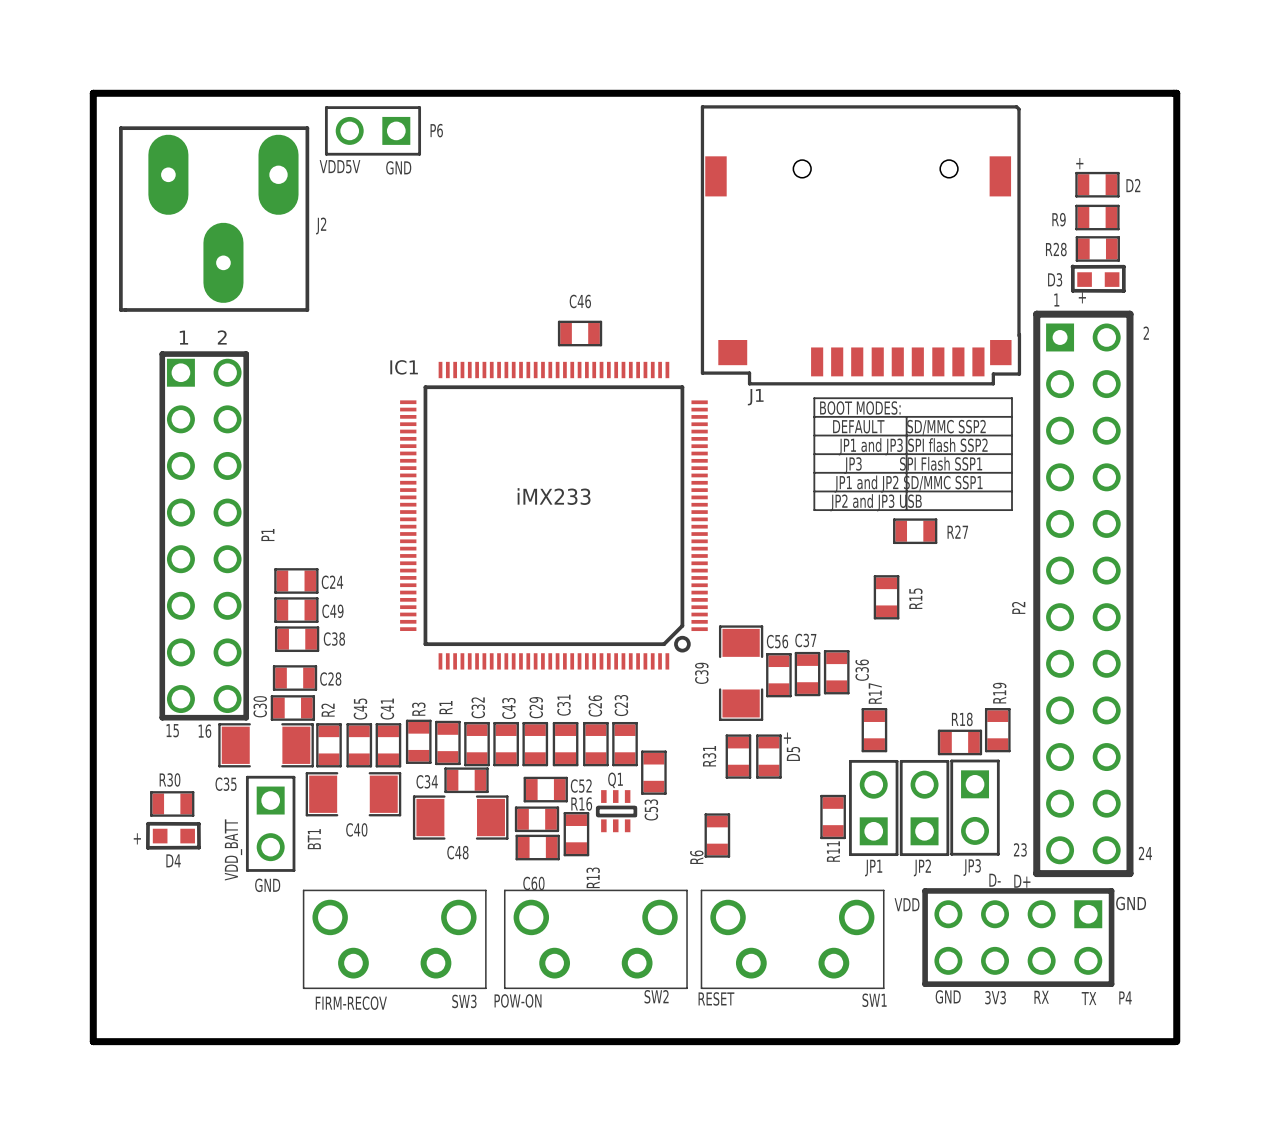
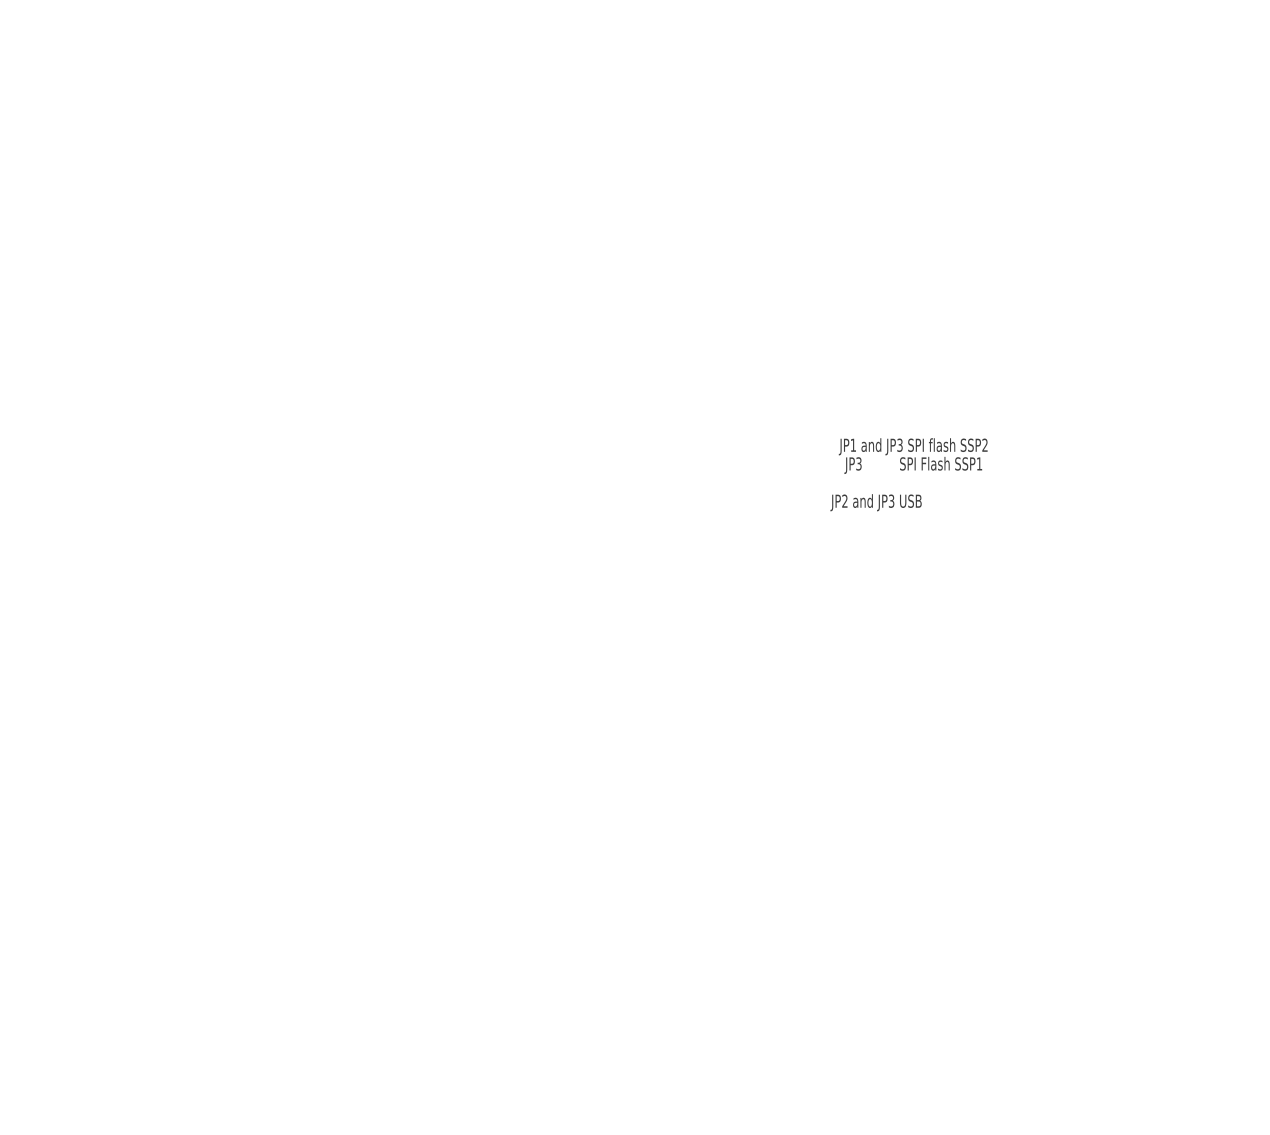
P6: (373, 130) -> none
text: + (1079, 163) -> none
text: VDD5V (339, 166) -> none
text: GND (398, 167) -> none
D2: (1097, 184) -> none
R9: (1097, 217) -> none
J2: (214, 219) -> none
J1: (860, 245) -> none
R28: (1097, 248) -> none
D3: (1098, 278) -> none
text: + (1082, 297) -> none
text: 1 (1056, 300) -> none
C46: (580, 333) -> none
text: 2 (1146, 333) -> none
text: 1 (183, 337) -> none
text: 2 (222, 337) -> none
line: (814, 398) (814, 510) (1012, 510) (1012, 398) (814, 398) -> none
text: BOOT MODES: (860, 408) -> none
line: (814, 416) (1012, 416) -> none
line: (906, 417) (906, 510) -> none
text: DEFAULT SD/MMC SSP2 (909, 427) -> none
line: (814, 435) (1012, 435) -> none
line: (814, 454) (1012, 454) -> none
line: (814, 472) (1012, 472) -> none
text: JP1 and JP2 SD/MMC SSP1 (908, 484) -> none
line: (814, 491) (1012, 491) -> none
IC1: iMX233 (553, 515) -> none
R27: (915, 531) -> none
P1: (204, 535) -> none
C24: (296, 580) -> none
P2: (1083, 593) -> none
R15: (886, 597) -> none
C49: (296, 610) -> none
C38: (297, 639) -> none
C36: (836, 672) -> none
C39: (741, 673) -> none
C37: (807, 674) -> none
C56: (778, 675) -> none
C28: (295, 678) -> none
C30: (292, 708) -> none
text: 15 (172, 730) -> none
R17: (874, 730) -> none
R19: (997, 730) -> none
text: 16 (204, 731) -> none
text: + (787, 738) -> none
R3: (418, 741) -> none
R1: (447, 742) -> none
R18: (959, 742) -> none
C32: (477, 744) -> none
C43: (506, 744) -> none
C29: (535, 744) -> none
C31: (565, 744) -> none
C26: (595, 744) -> none
C23: (625, 744) -> none
C35: (266, 745) -> none
R2: (328, 745) -> none
C45: (359, 745) -> none
C41: (388, 745) -> none
R31: (738, 756) -> none
D5: (768, 756) -> none
C53: (653, 772) -> none
C34: (466, 780) -> none
C52: (545, 789) -> none
C40: (353, 794) -> none
R30: (172, 803) -> none
JP1: (873, 807) -> none
JP2: (924, 807) -> none
JP3: (975, 807) -> none
Q1: (616, 811) -> none
R11: (833, 816) -> none
C48: (460, 817) -> none
R16: (537, 819) -> none
BT1: (270, 823) -> none
R13: (576, 834) -> none
D4: (173, 835) -> none
R6: (717, 835) -> none
text: + (137, 838) -> none
C60: (537, 847) -> none
text: VDD_BATT (233, 849) -> none
text: 23 (1020, 849) -> none
text: 24 (1145, 853) -> none
text: D- (995, 880) -> none
text: D+ (1022, 881) -> none
text: GND (267, 885) -> none
text: GND (1131, 903) -> none
text: VDD (907, 904) -> none
P4: (1018, 937) -> none
SW3: (394, 939) -> none
SW2: (595, 939) -> none
SW1: (792, 939) -> none
text: GND (948, 996) -> none
text: 3V3 (995, 997) -> none
text: RX (1041, 997) -> none
text: RESET (716, 998) -> none
text: TX (1089, 998) -> none
text: POW-ON (518, 1000) -> none
text: FIRM-RECOV (351, 1003) -> none
board edge: (1176, 1041) (1176, 93) (93, 93) (93, 1041) (1175, 1041) -> none

